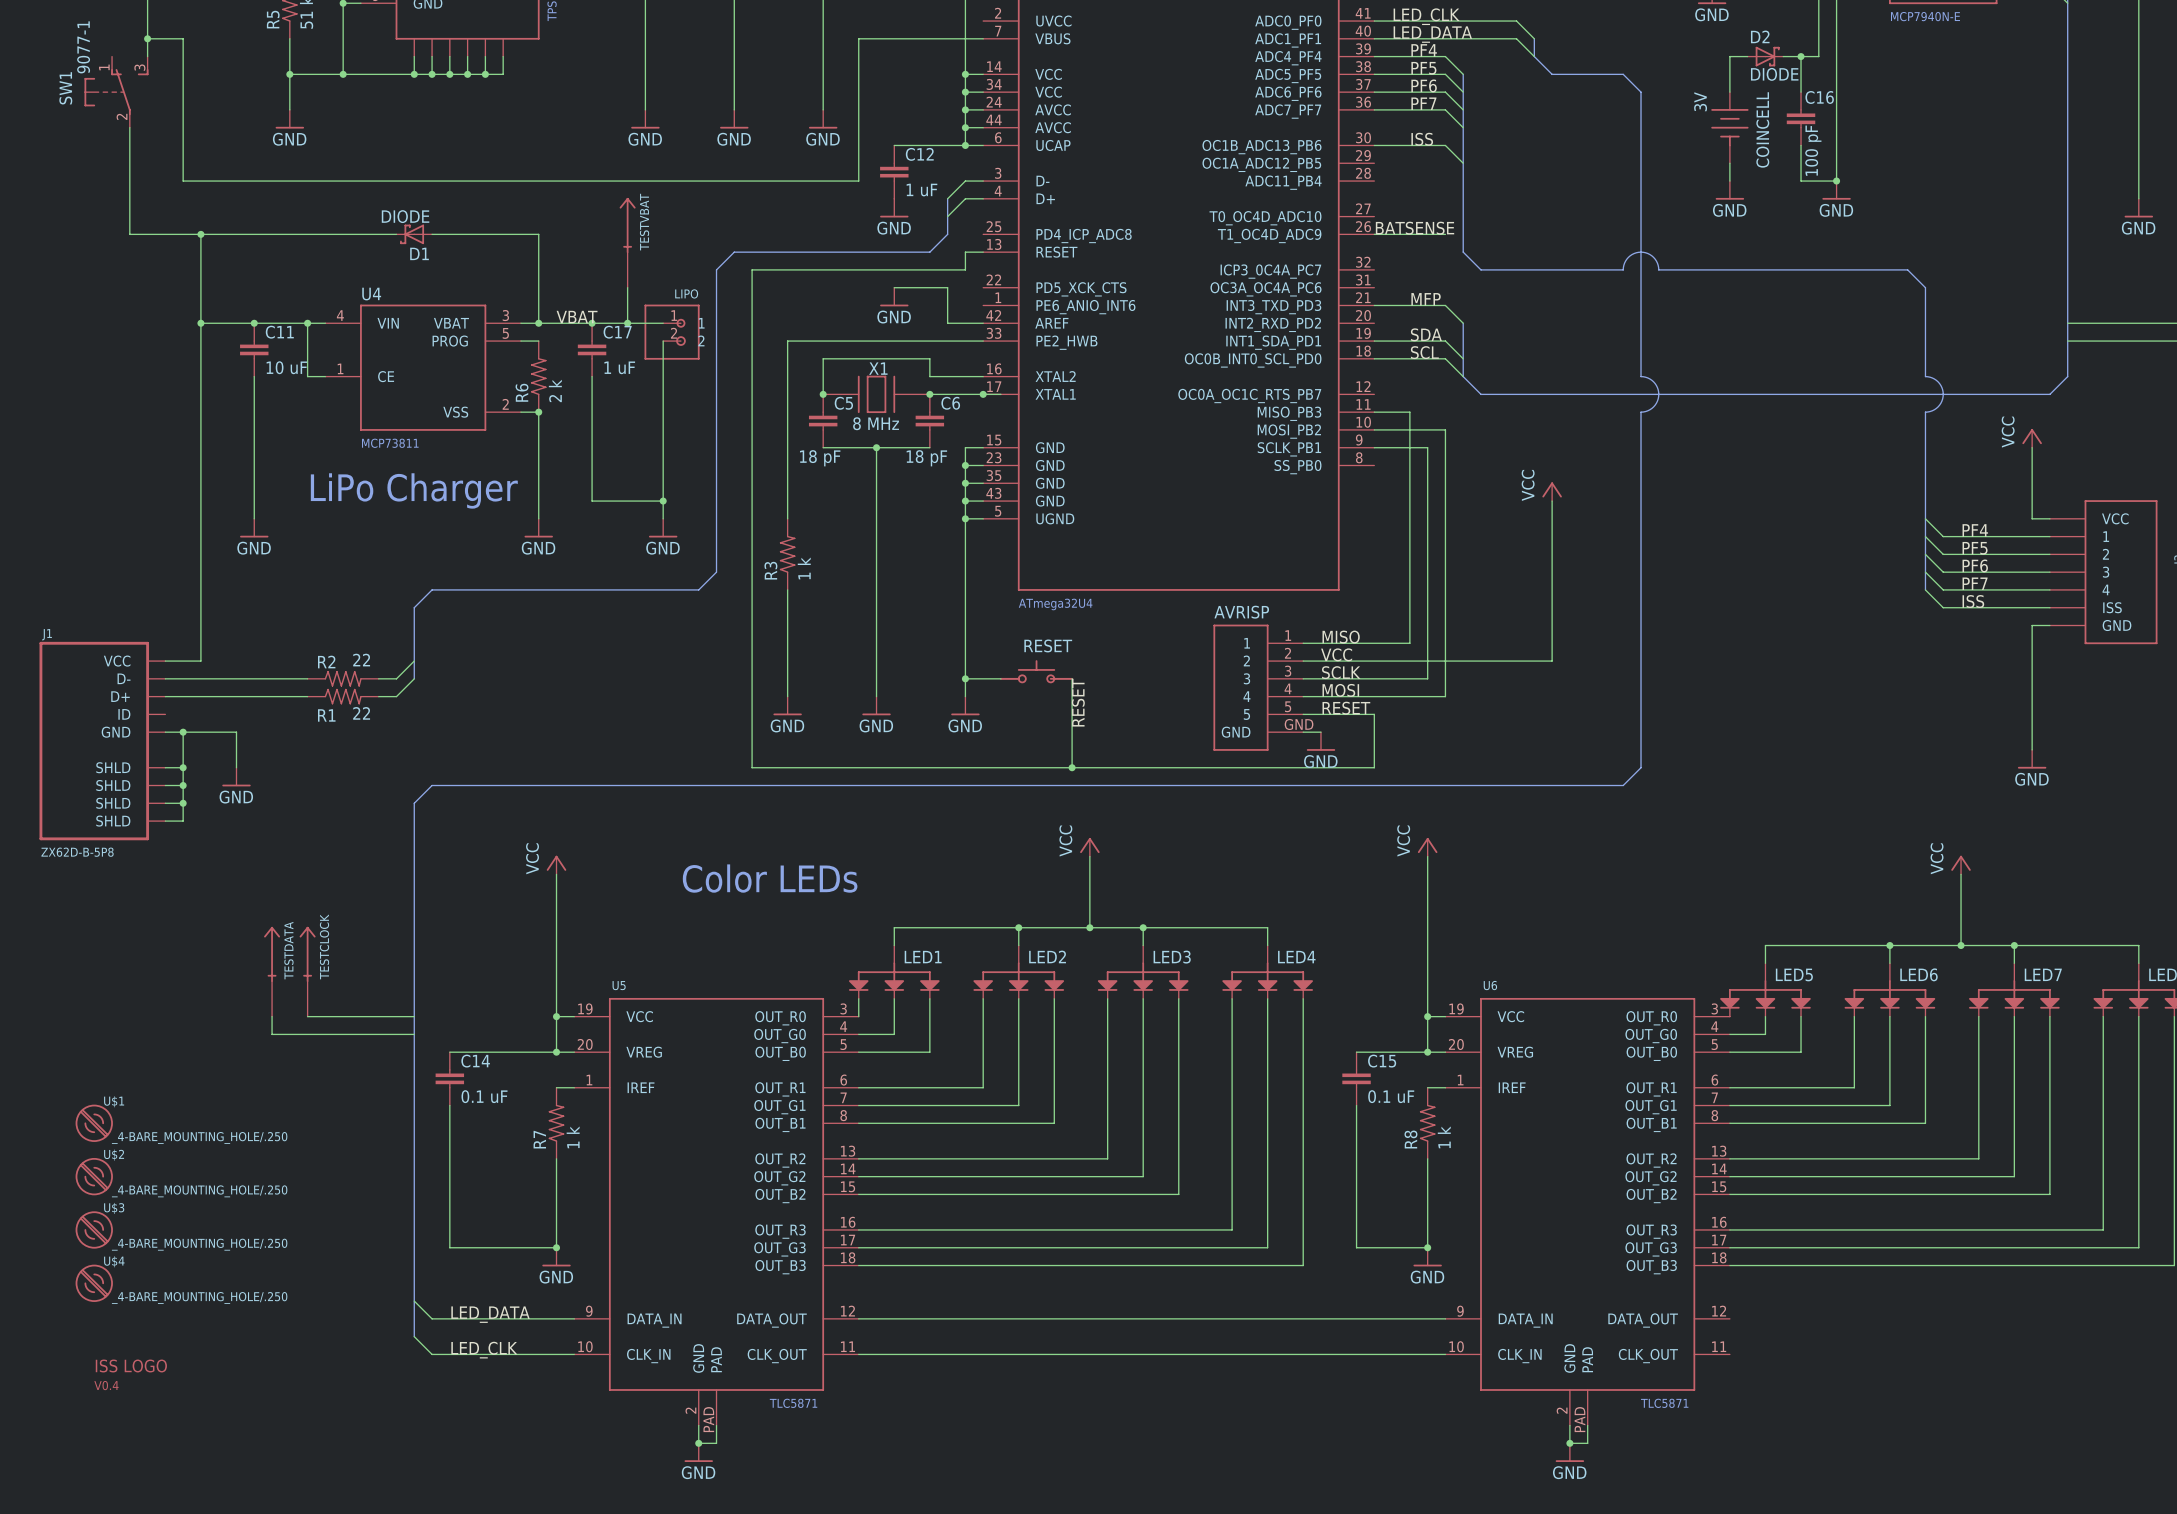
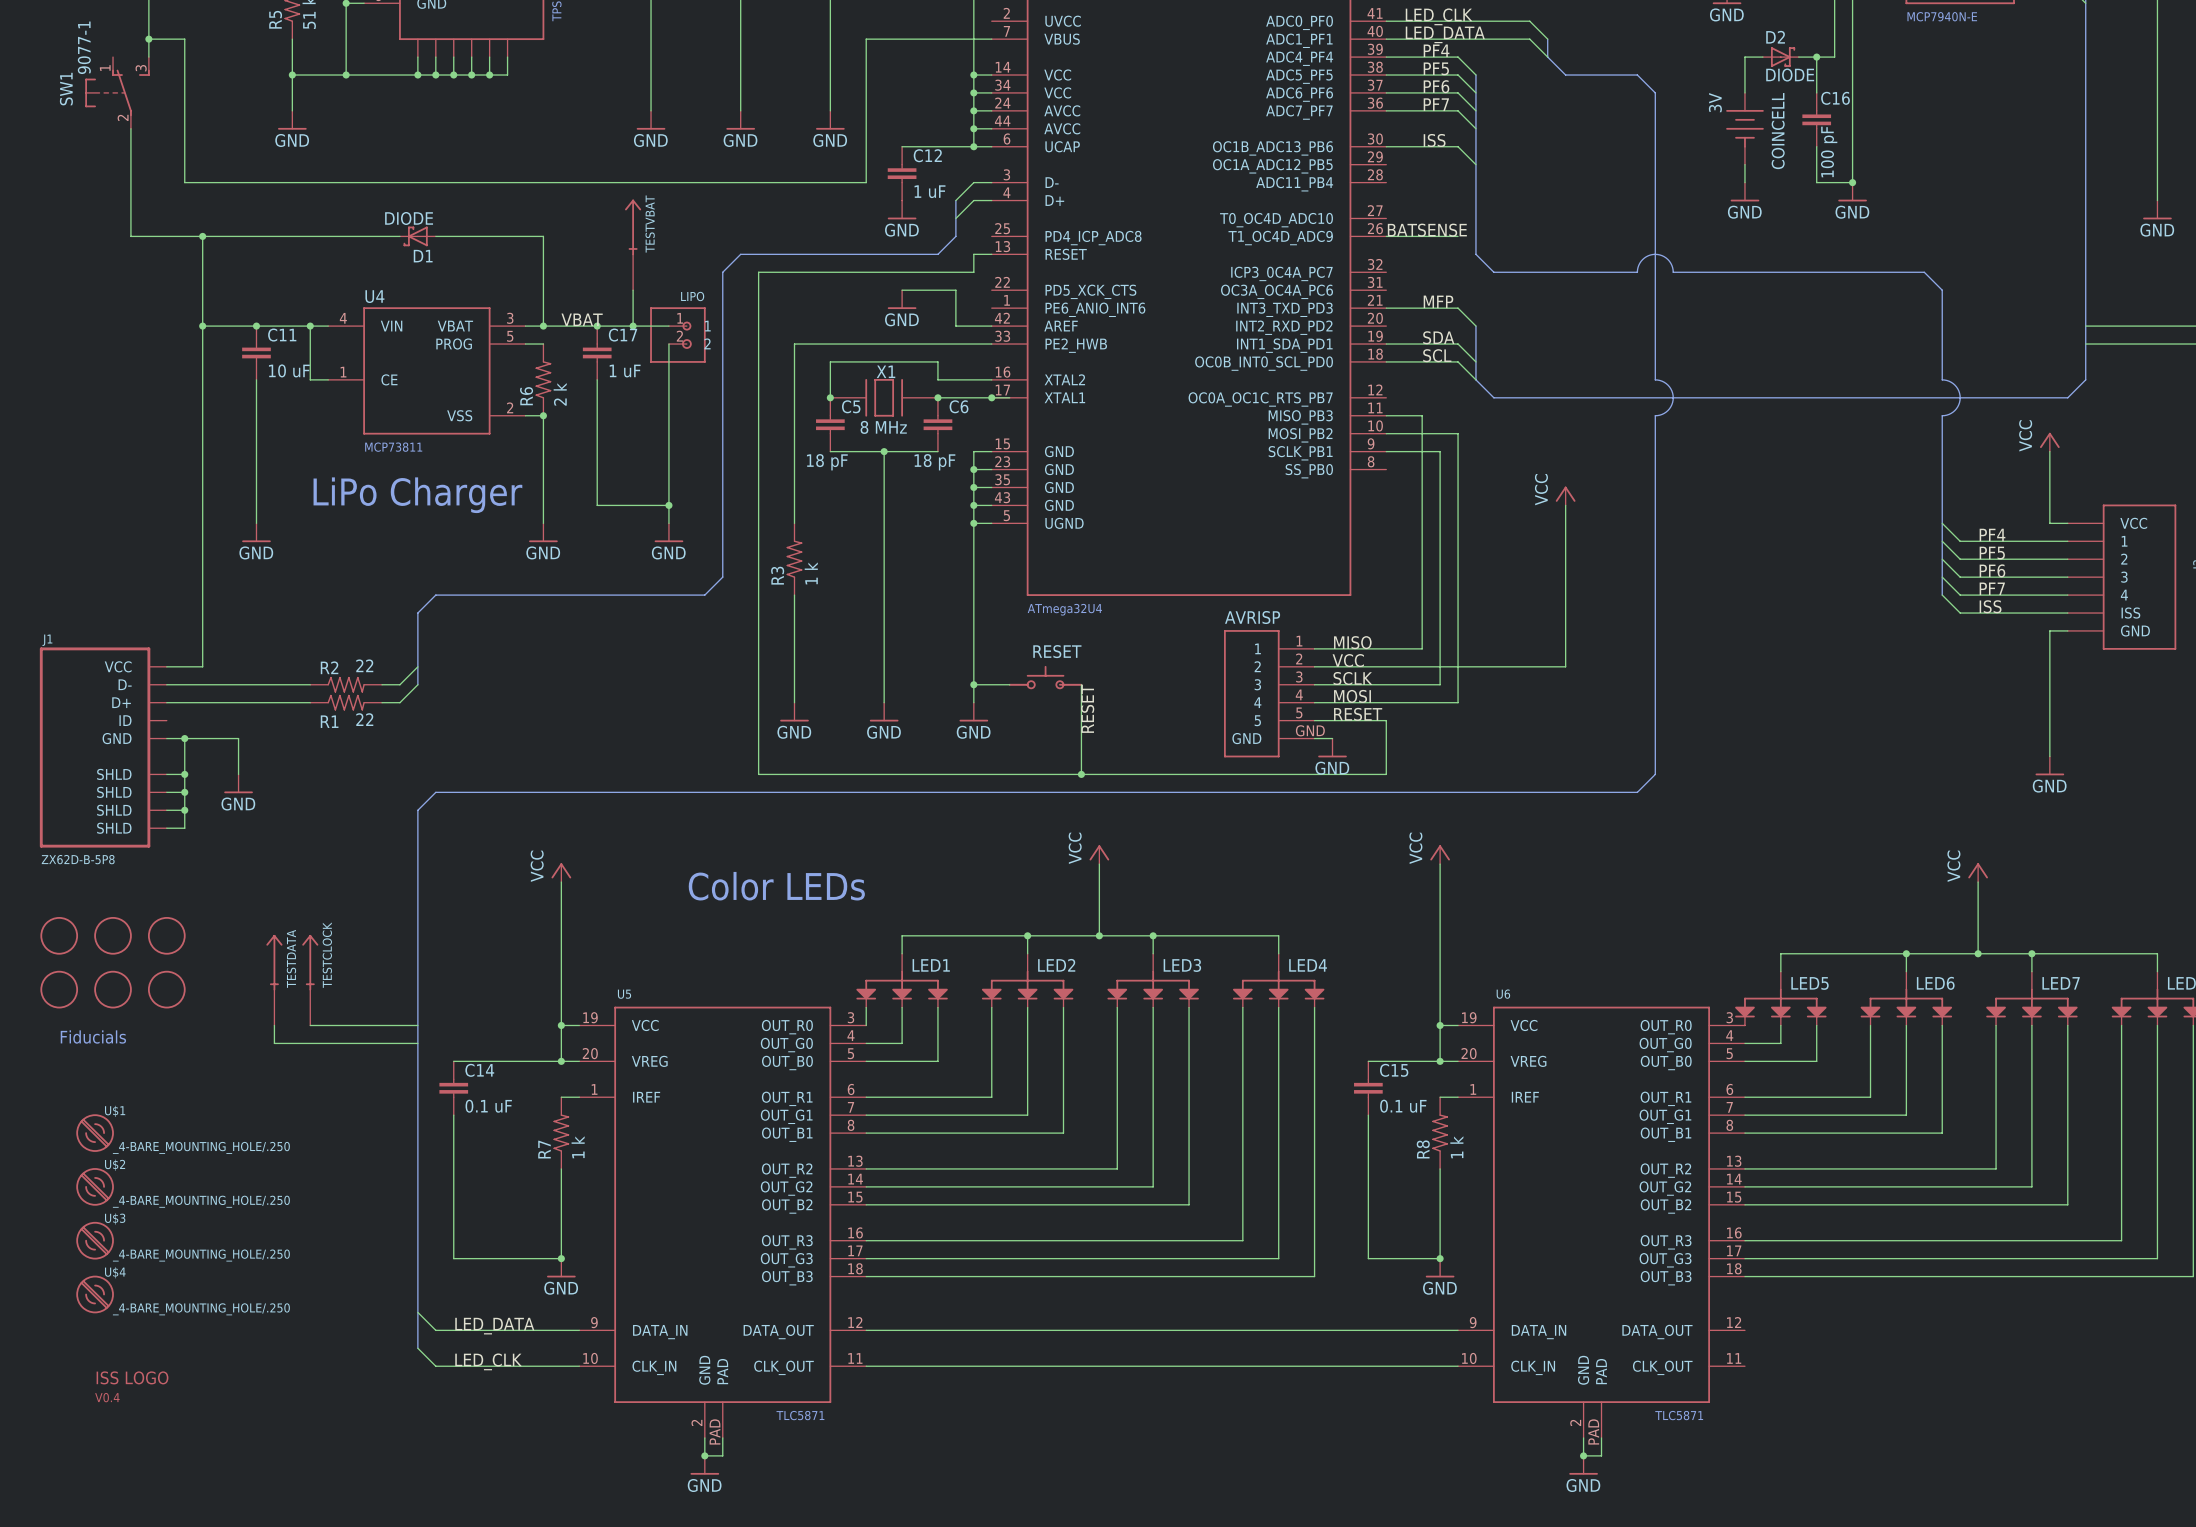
part: none -> (59, 935)
part: none -> (113, 935)
part: none -> (166, 935)
part: none -> (59, 989)
part: none -> (113, 989)
part: none -> (166, 989)
text: none -> Fiducials (93, 1037)

